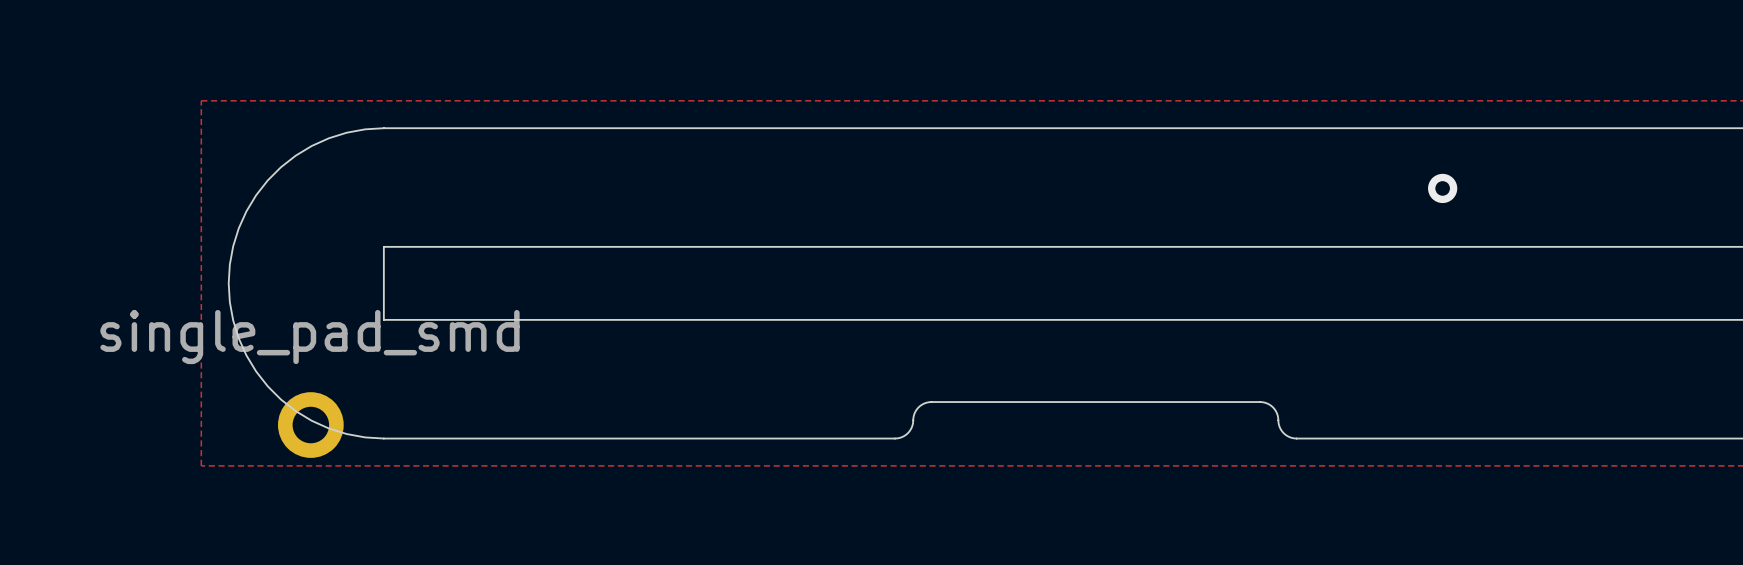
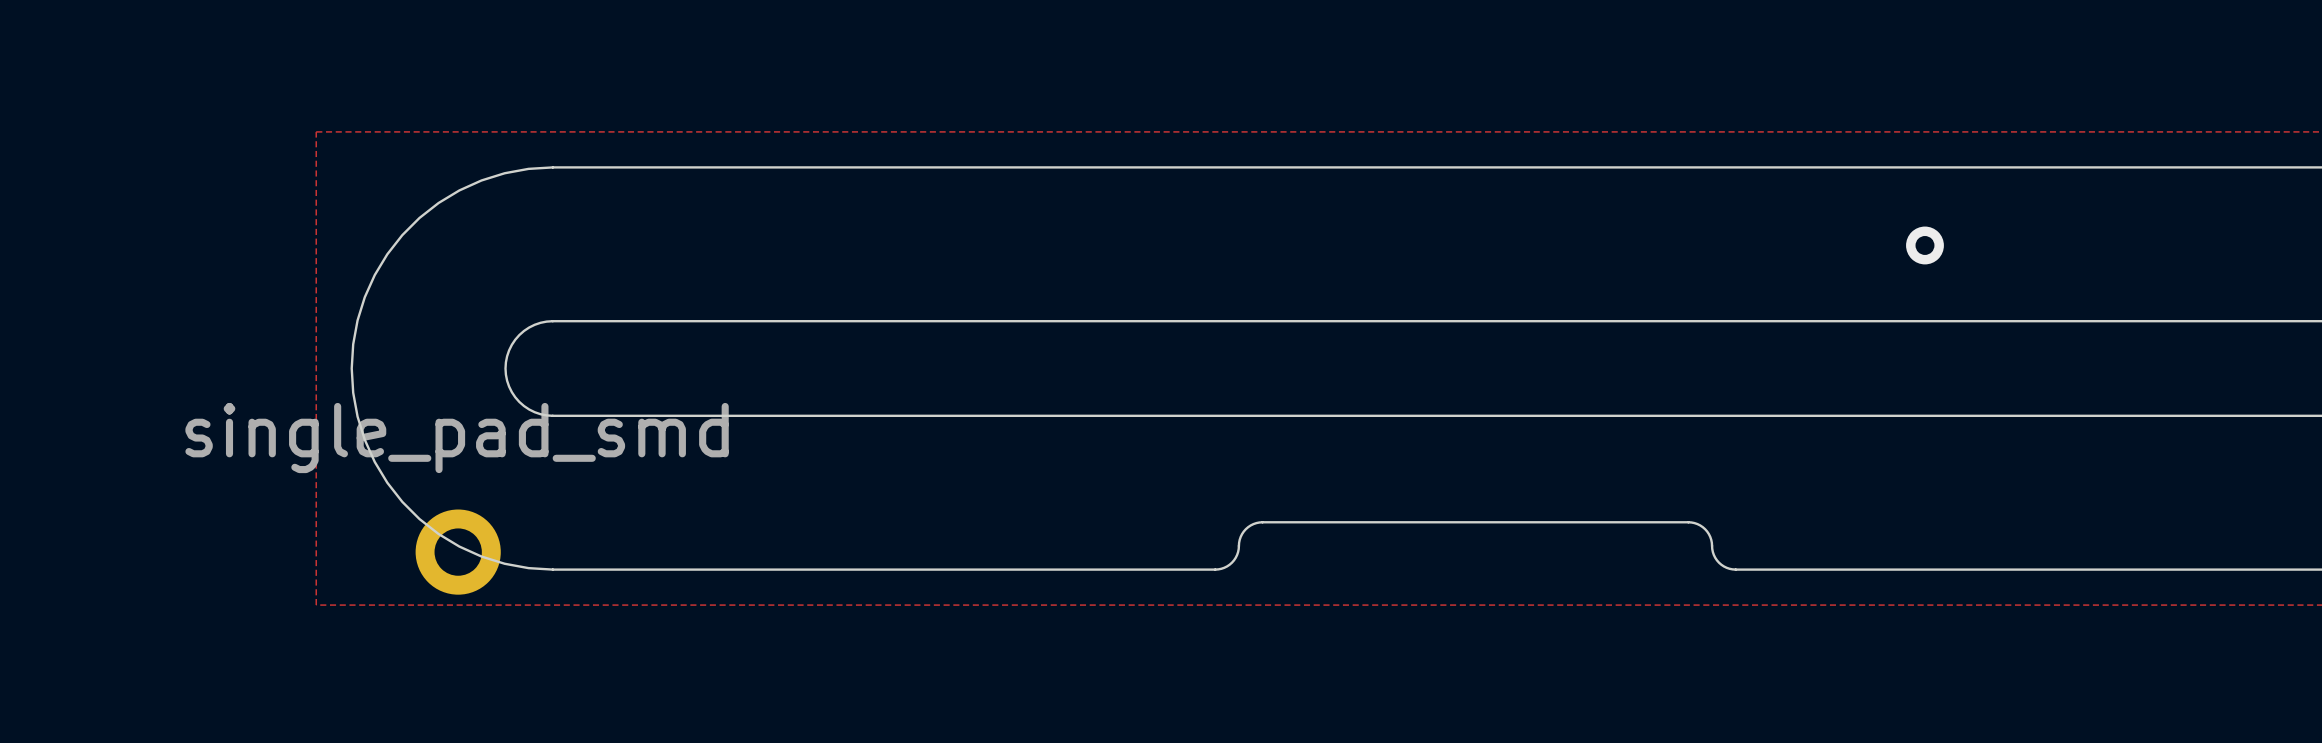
board edge: (383, 246) (383, 319) -> (552, 321) (534, 324) (519, 335) (509, 350) (505, 368) (509, 386) (519, 401) (534, 412) (552, 415)

